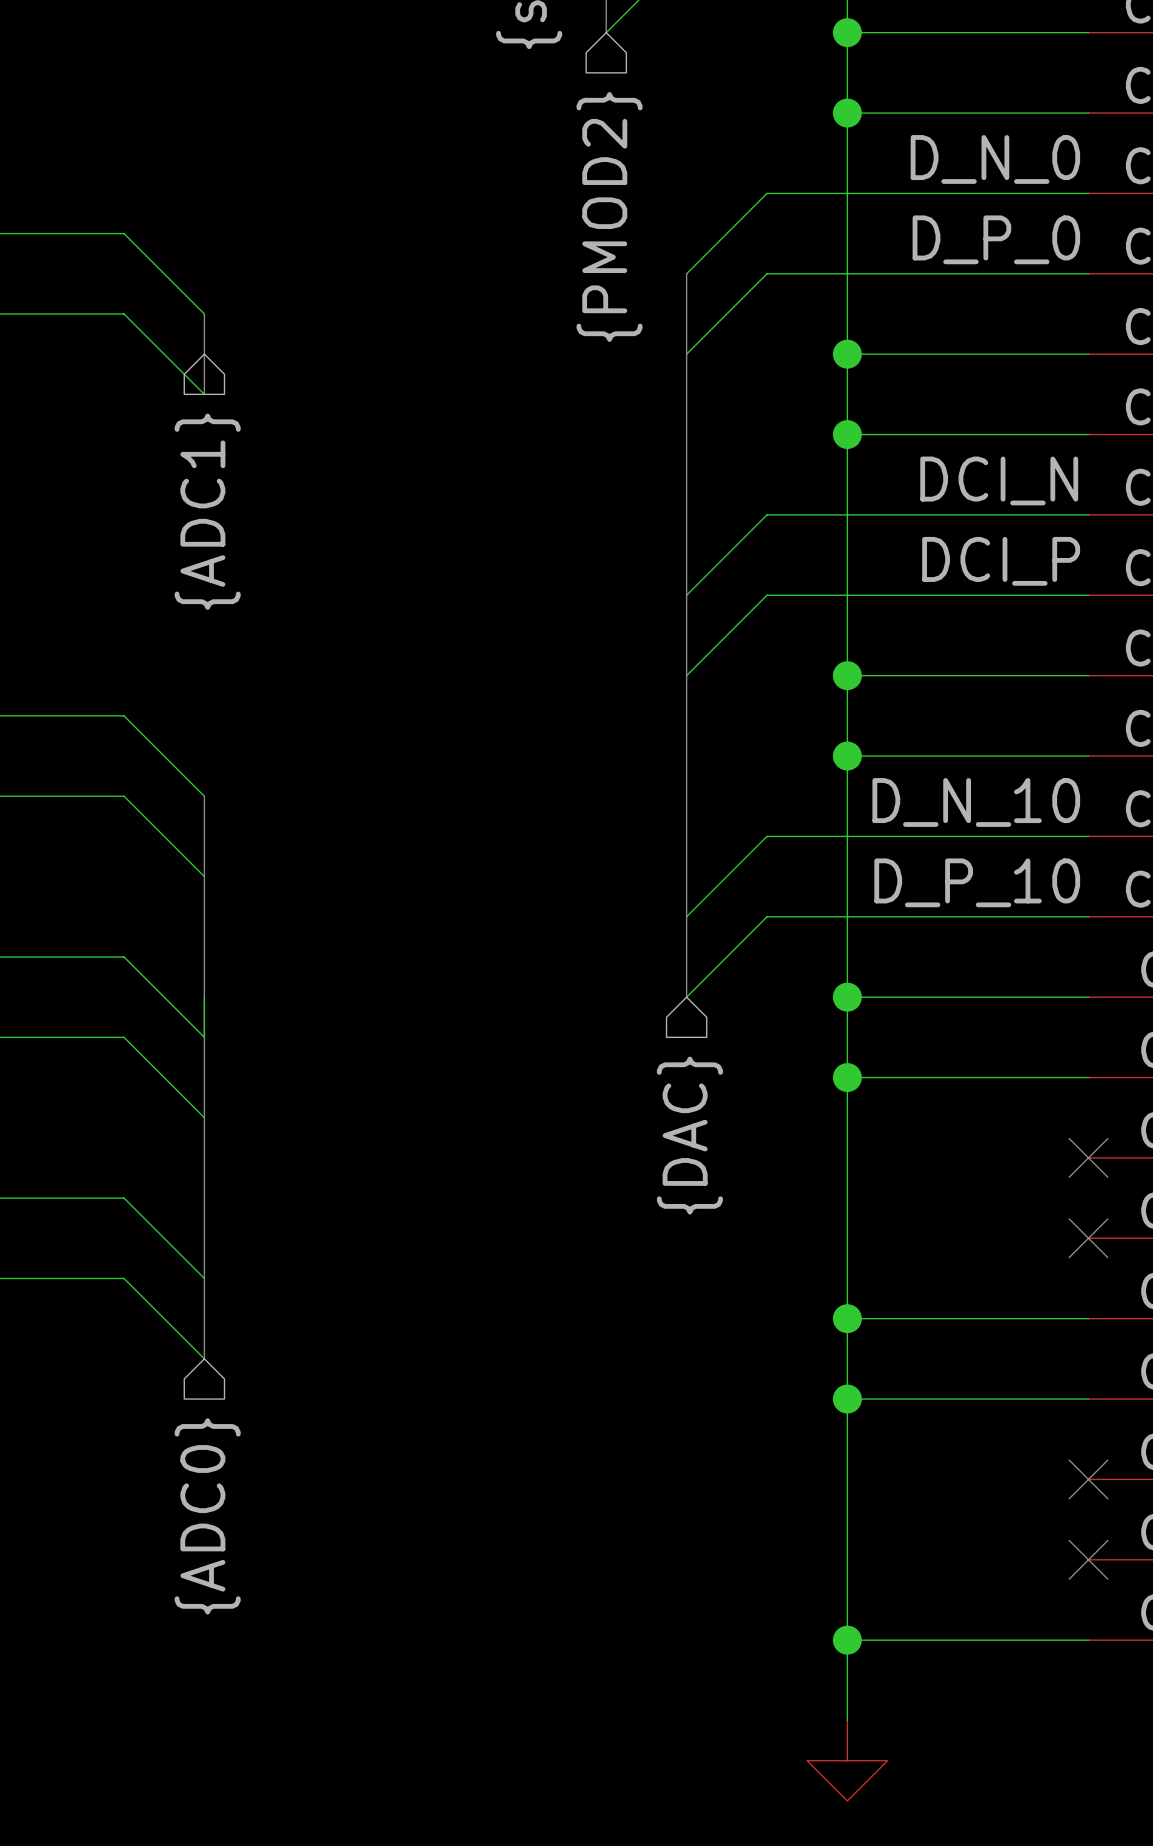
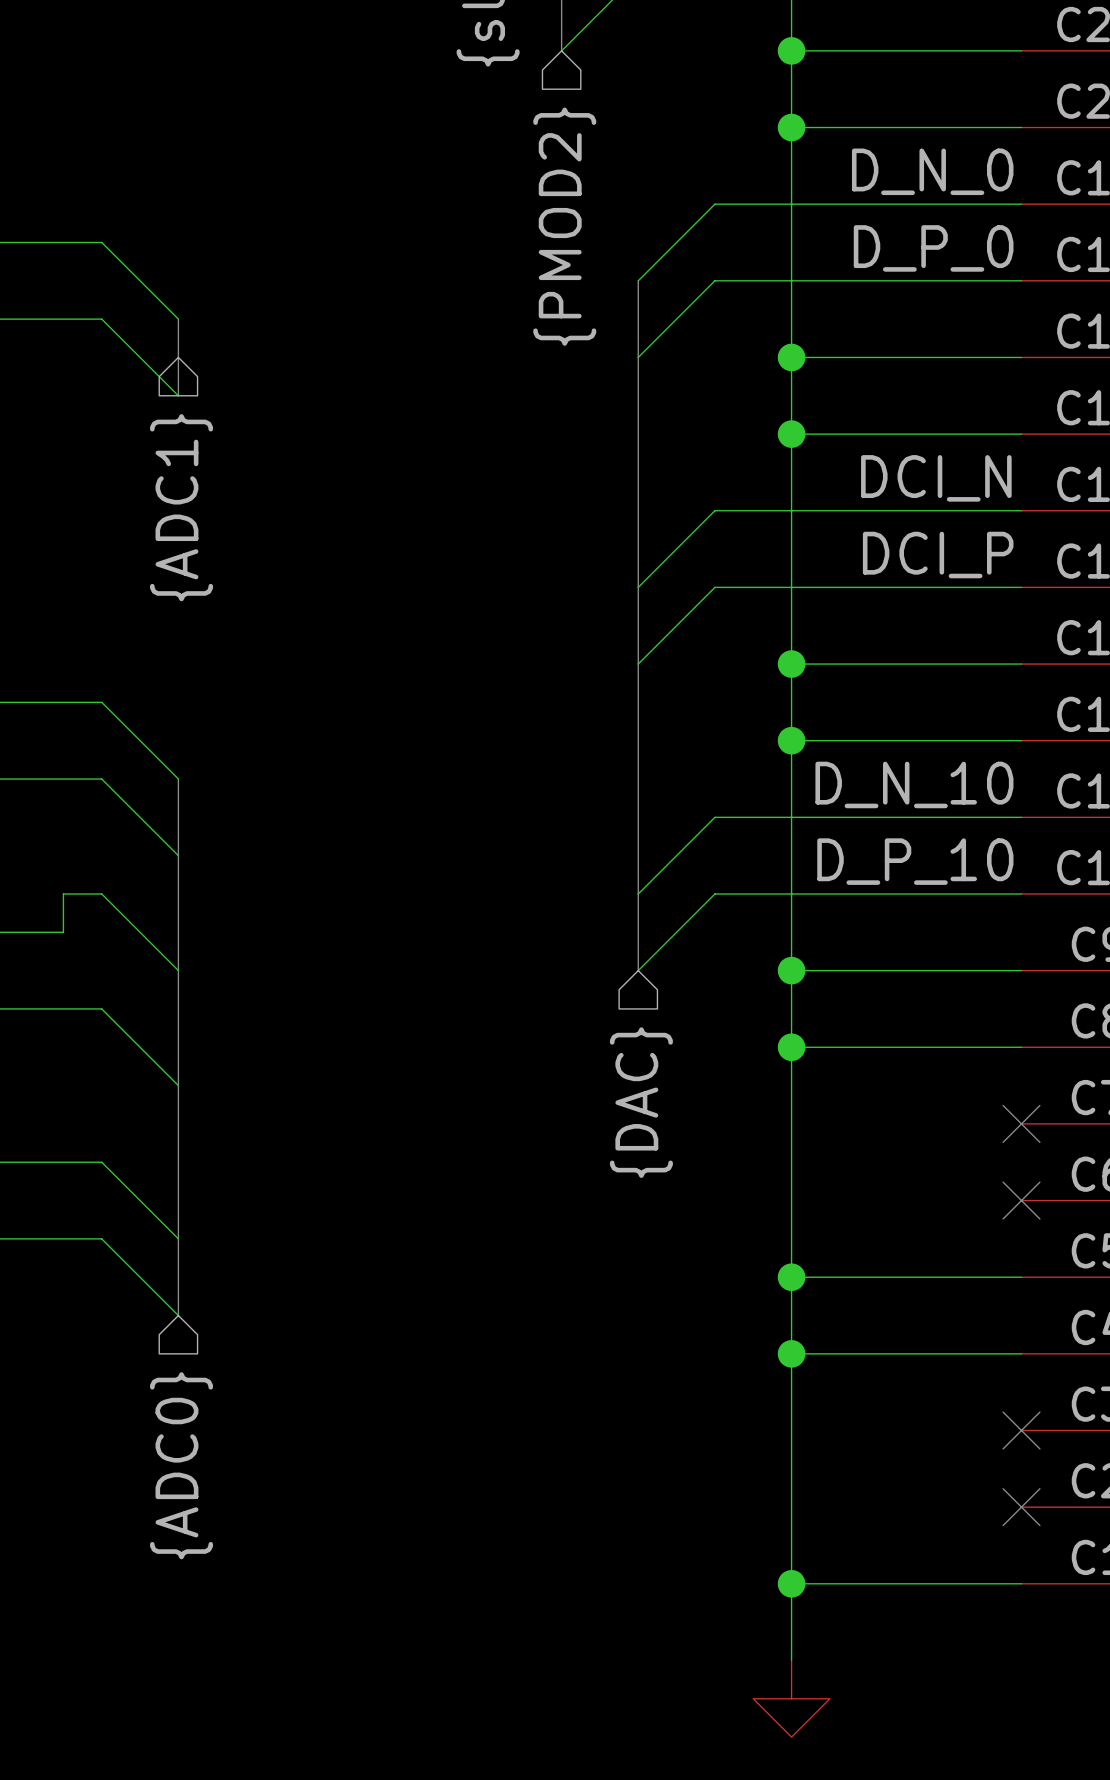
wire: (83, 956) (124, 956) (204, 1037) (204, 997) -> (63, 932) (63, 893) (101, 893) (178, 970)

